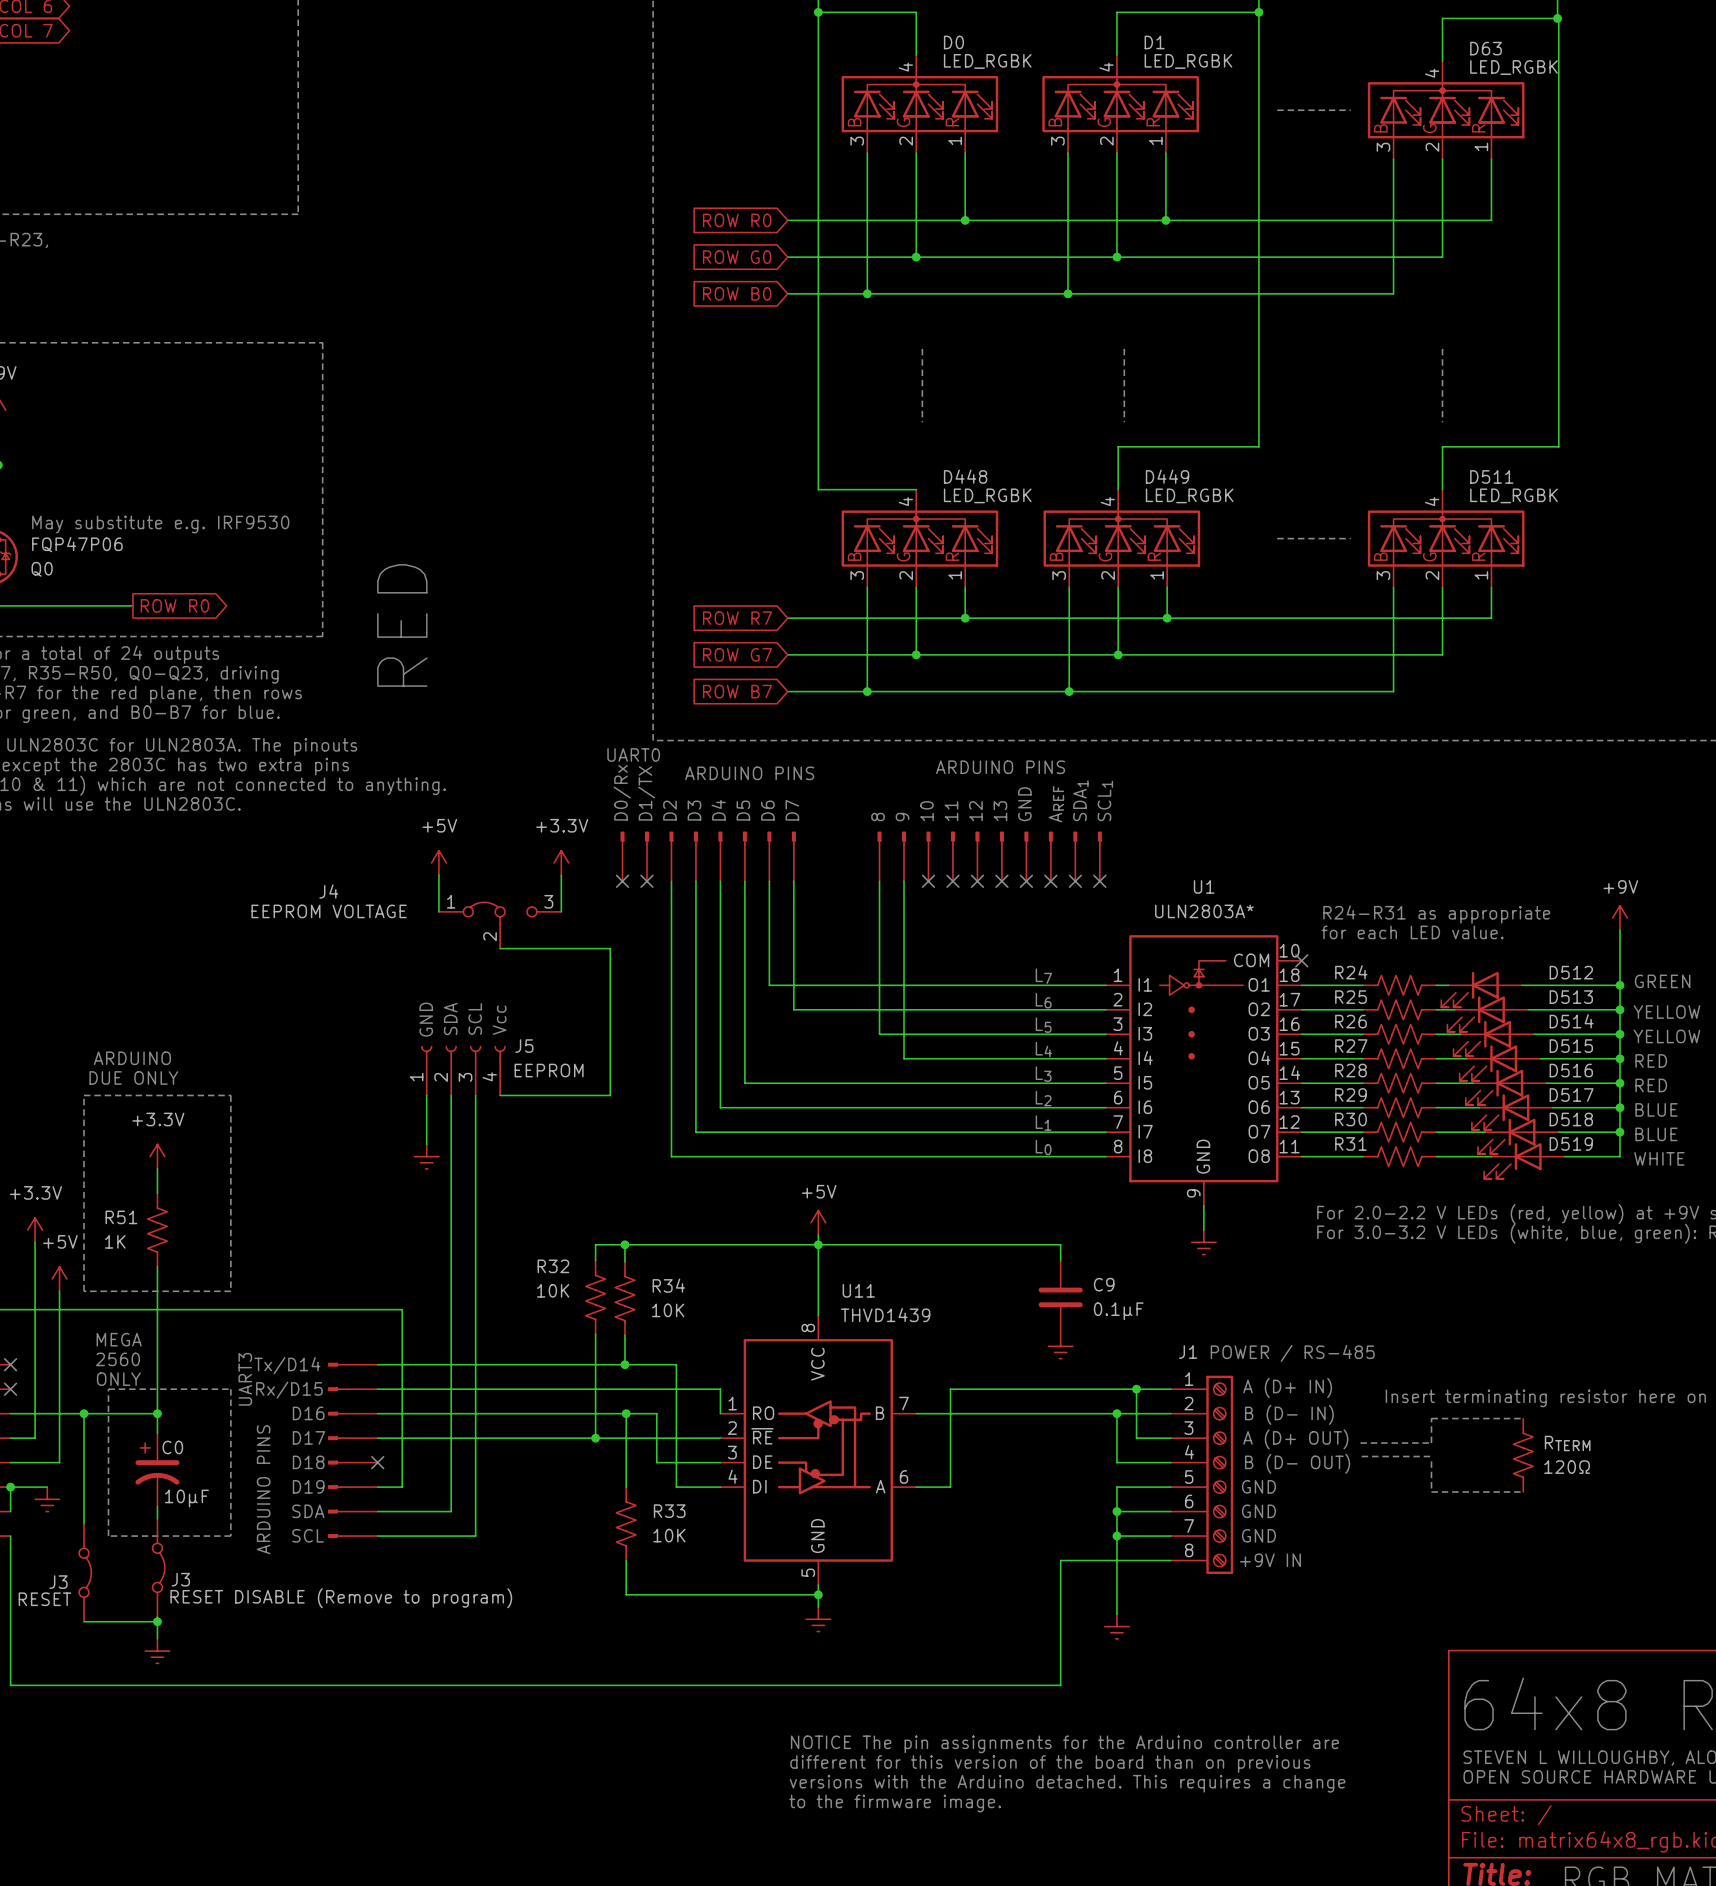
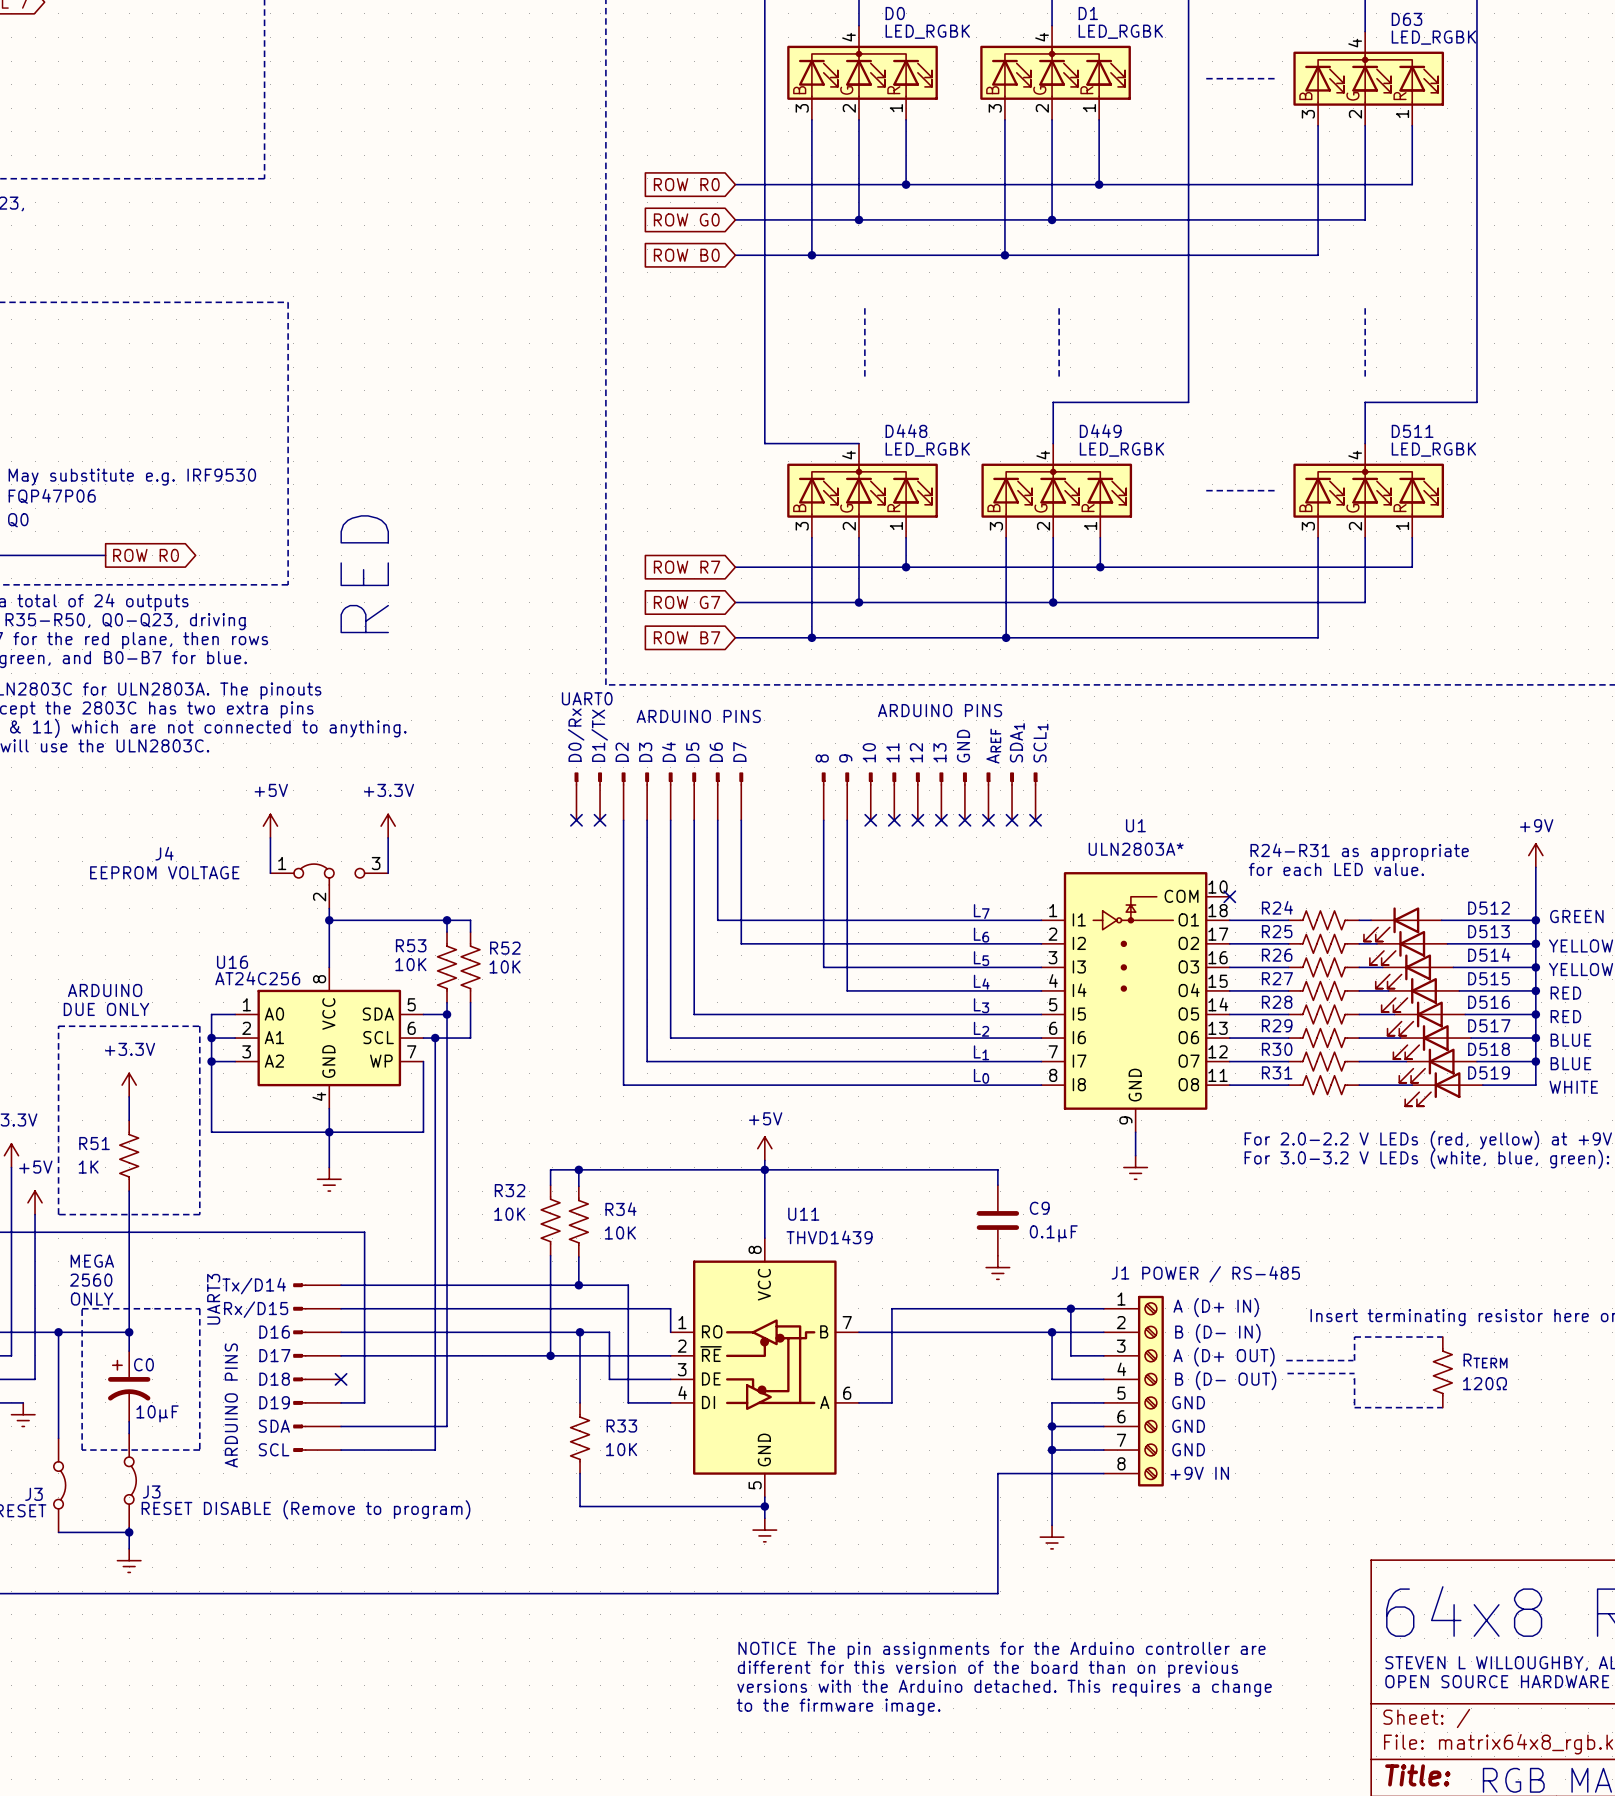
power symbol position: +5V (438, 862) -> +5V (270, 826)
power symbol position: +3.3V (561, 862) -> +3.3V (388, 826)
wire: (438, 875) (438, 911) -> (270, 837) (270, 873)
wire: (561, 875) (561, 911) -> (388, 837) (388, 873)
J4 position: (500, 925) -> (329, 886)
wire: (500, 948) (610, 948) (610, 1095) (500, 1095) -> none
wire: none -> (329, 908) (329, 967)
wire: none -> (329, 920) (470, 920) (470, 932)
junction: none -> (329, 920)
junction: none -> (447, 920)
text: GND (426, 1019) -> none
text: SDA (450, 1019) -> none
text: SCL (475, 1019) -> none
text: Vcc (499, 1020) -> none
R53: none -> 10K (447, 967)
R52: none -> 10K (470, 967)
J5: EEPROM (463, 1070) -> none
wire: none -> (470, 1002) (470, 1038) (423, 1038)
wire: none -> (235, 1014) (211, 1014) (211, 1132) (423, 1132) (423, 1061)
wire: none -> (423, 1014) (447, 1014)
junction: none -> (447, 1014)
wire: (451, 1095) (451, 1511) -> (447, 1002) (447, 1426) (411, 1426)
wire: (475, 1095) (475, 1107) -> (447, 920) (447, 932)
wire: none -> (211, 1038) (235, 1038)
junction: none -> (211, 1038)
U16: none -> AT24C256 (329, 1038)
junction: none -> (435, 1038)
wire: none -> (211, 1061) (235, 1061)
junction: none -> (211, 1061)
power symbol position: (426, 1156) -> (329, 1179)
wire: none -> (329, 1108) (329, 1167)
junction: none -> (329, 1132)

